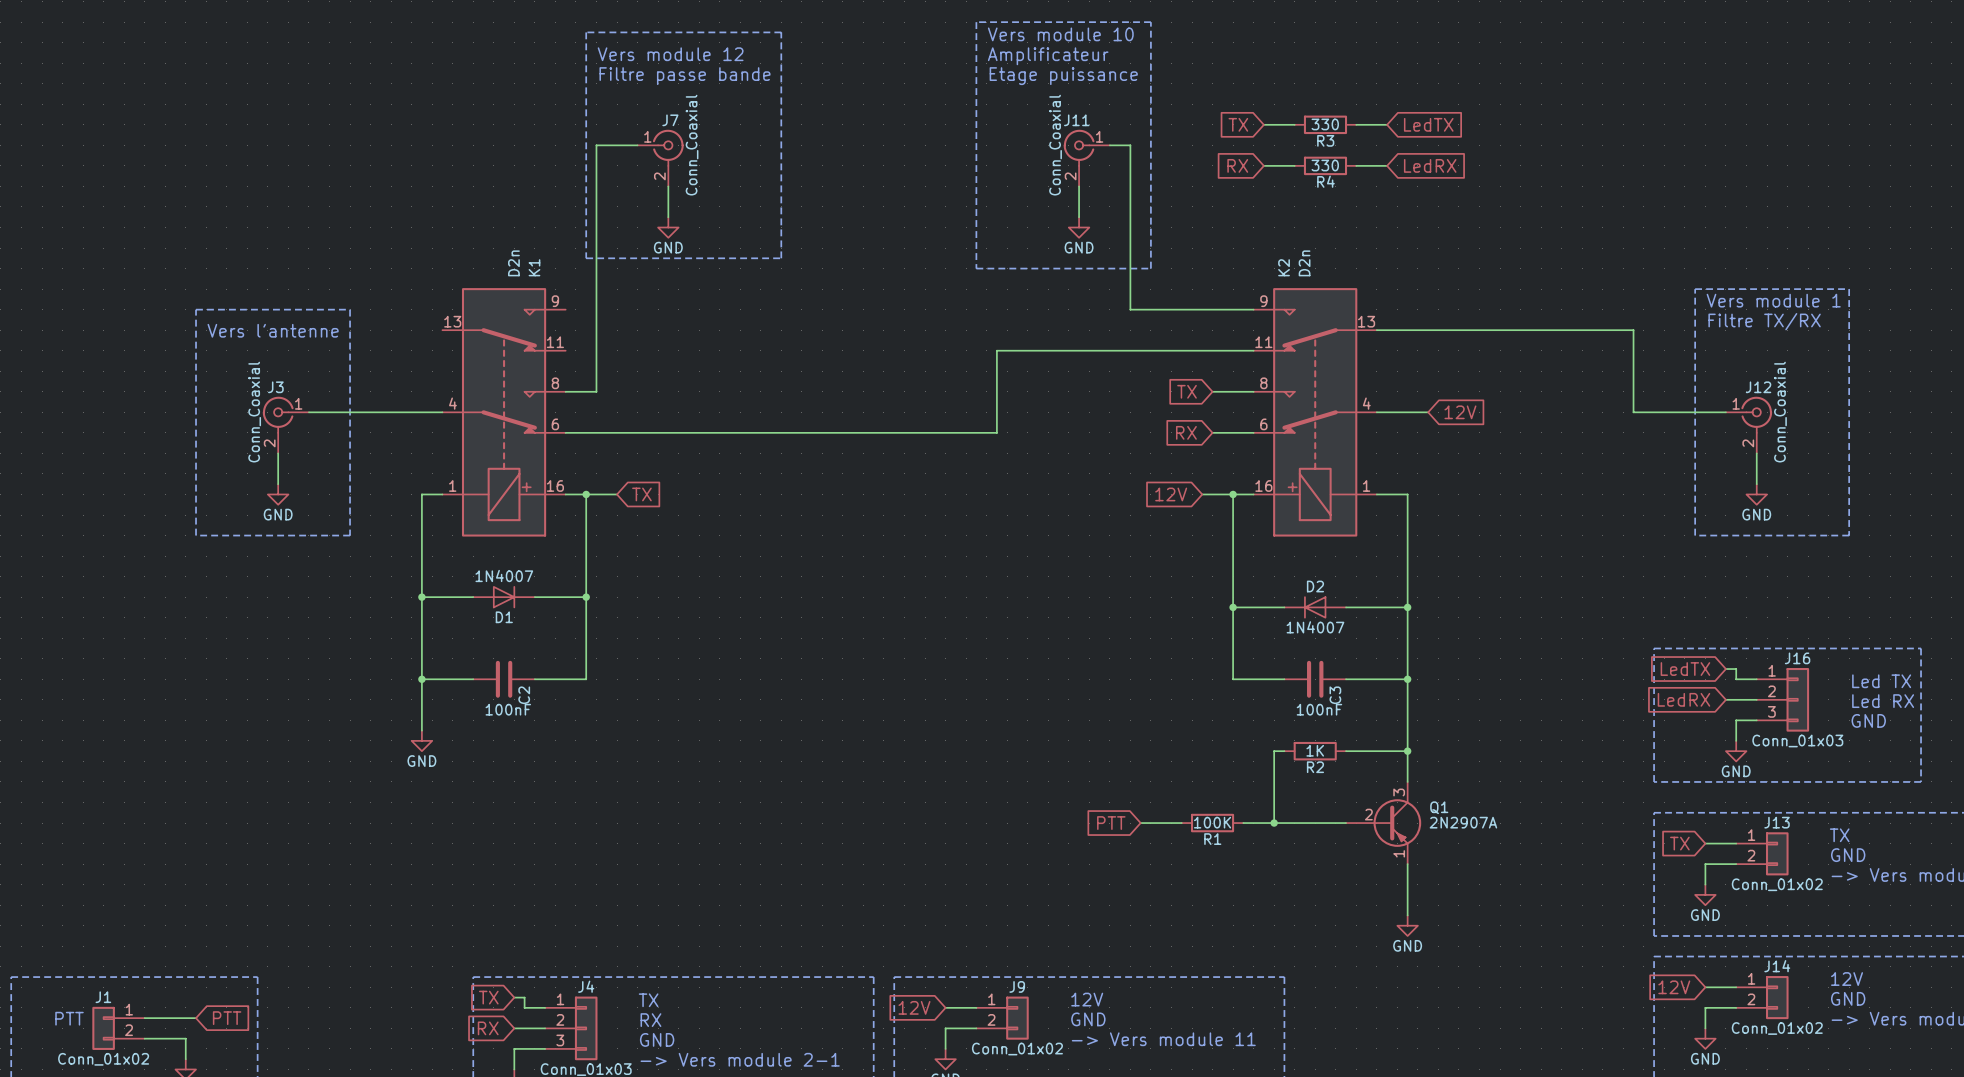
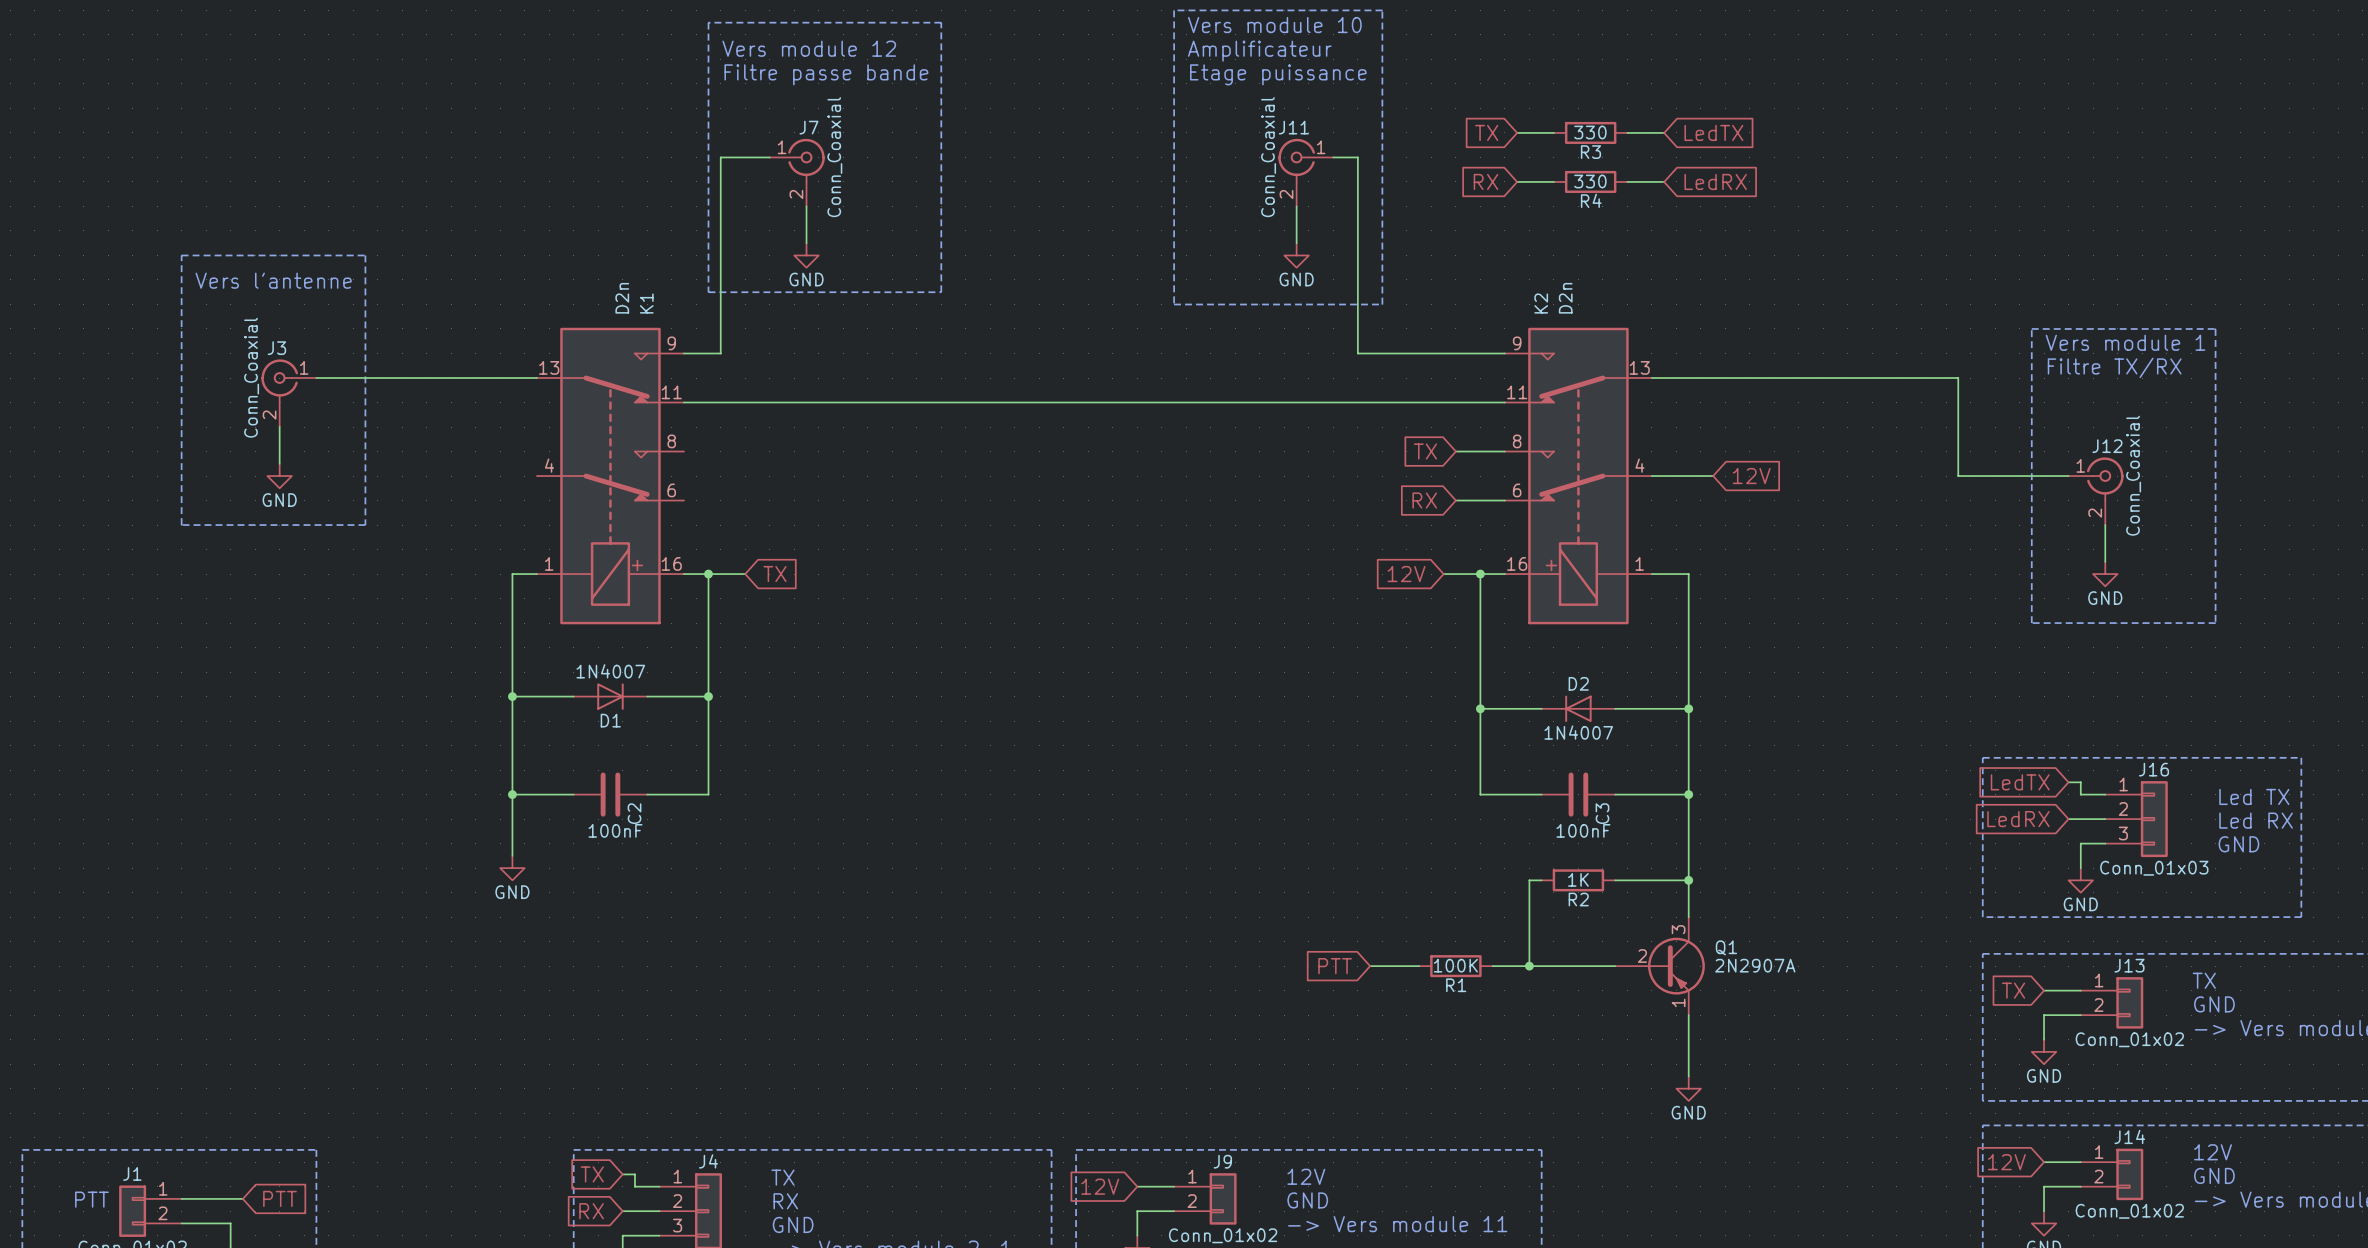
line: (196, 309) (350, 309) (350, 535) (196, 535) (196, 309) -> (181, 255) (365, 255) (365, 525) (181, 525) (181, 255)
wire: (596, 309) (596, 391) (565, 391) -> (720, 353) (683, 353)
wire: none -> (316, 378) (536, 378)
text position: Vers l'antenne (273, 330) -> Vers l'antenne (273, 280)
wire: (996, 350) (996, 432) (565, 432) -> (1198, 402) (683, 402)
wire: (308, 412) (442, 412) -> none
J3 position: (285, 425) -> (288, 393)
wire: (278, 453) (278, 484) -> (279, 427) (279, 463)
power symbol position: GND (278, 494) -> GND (279, 476)

